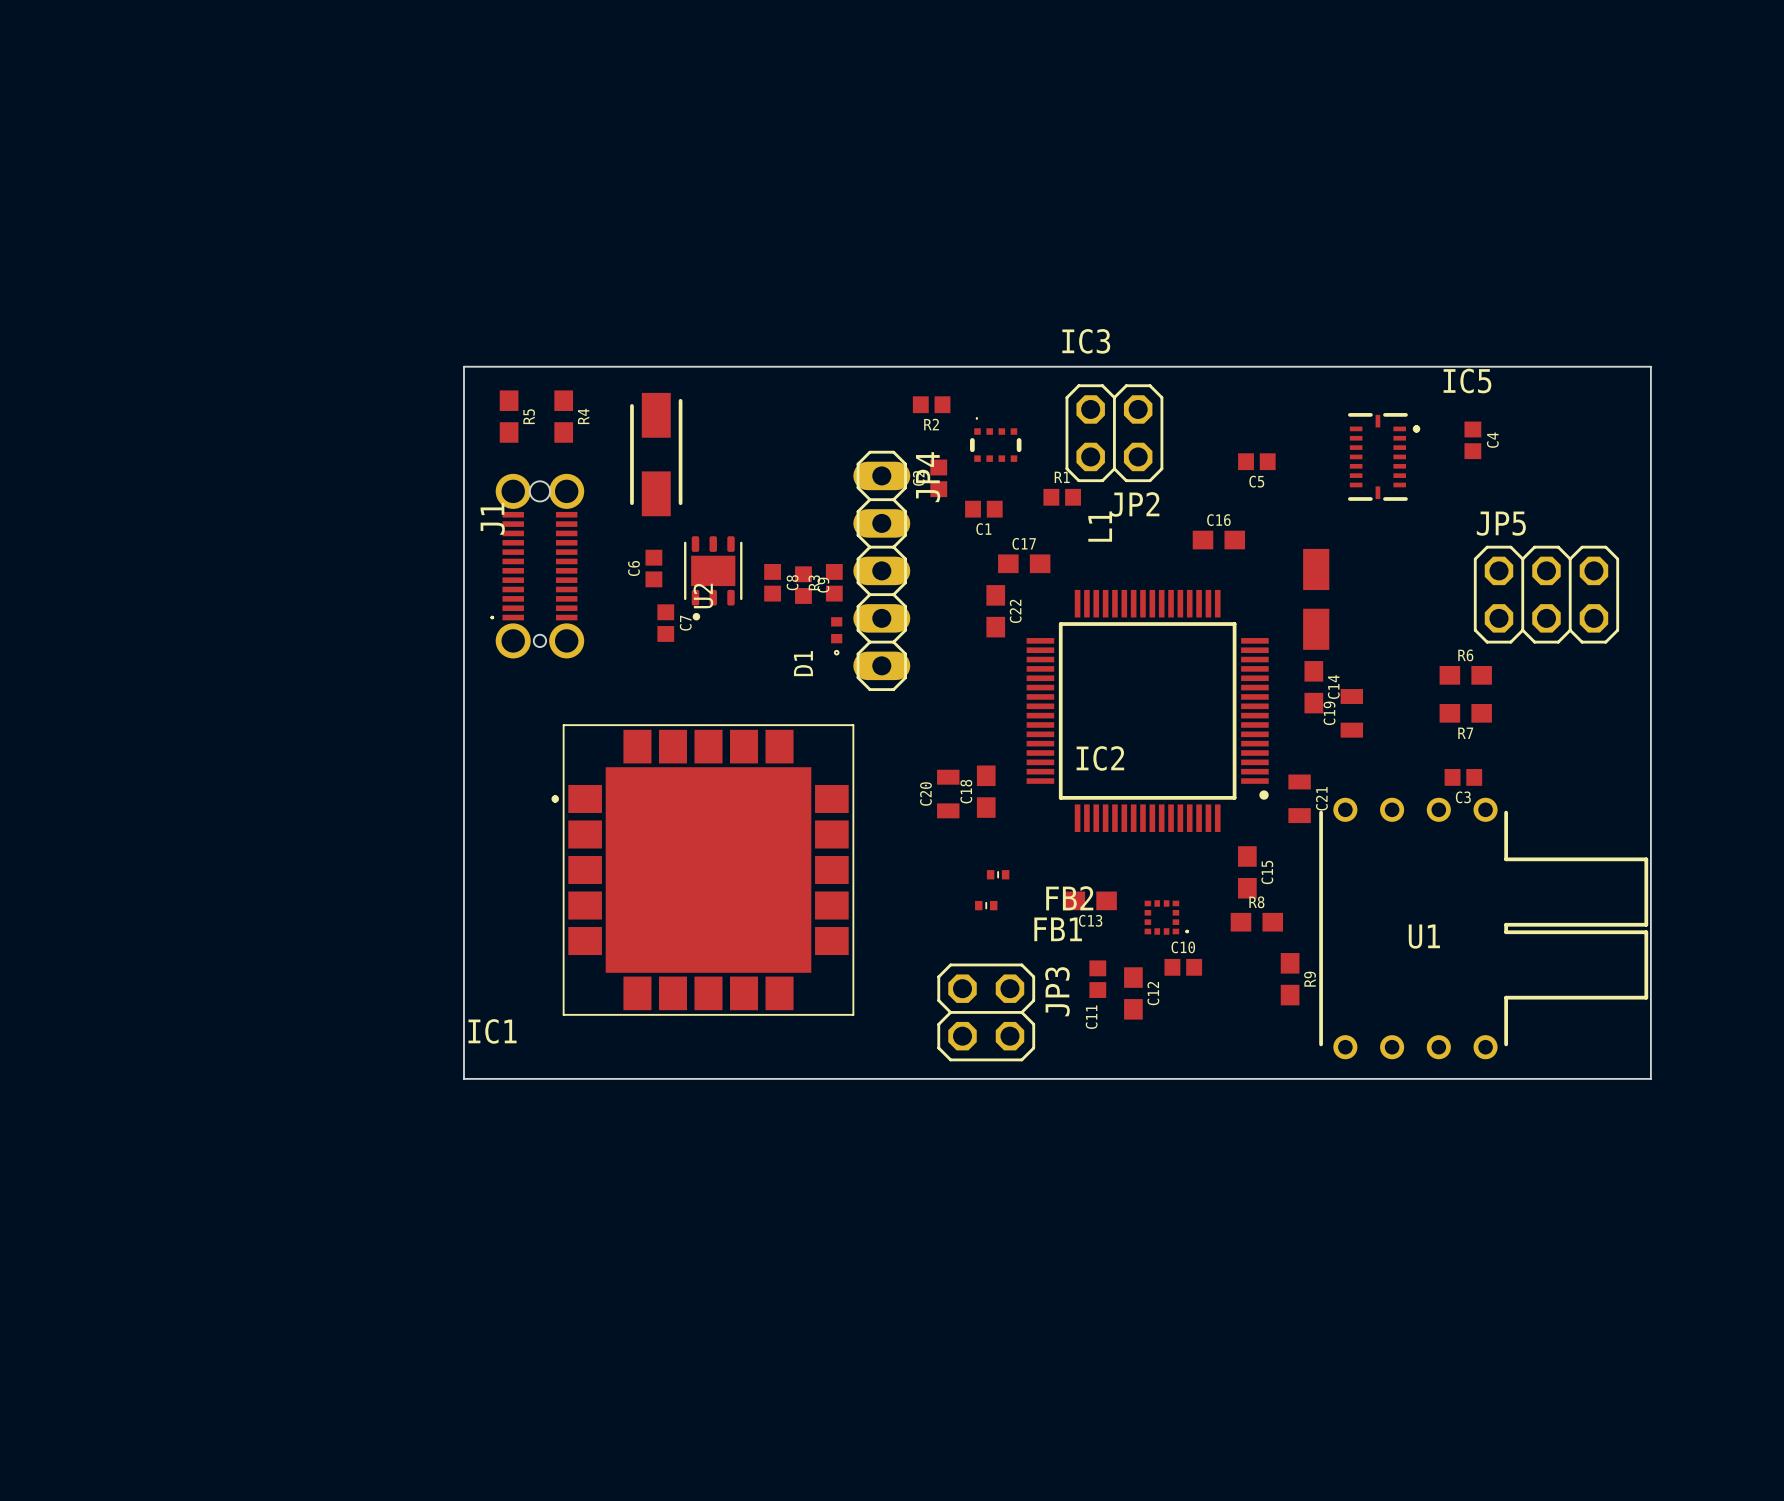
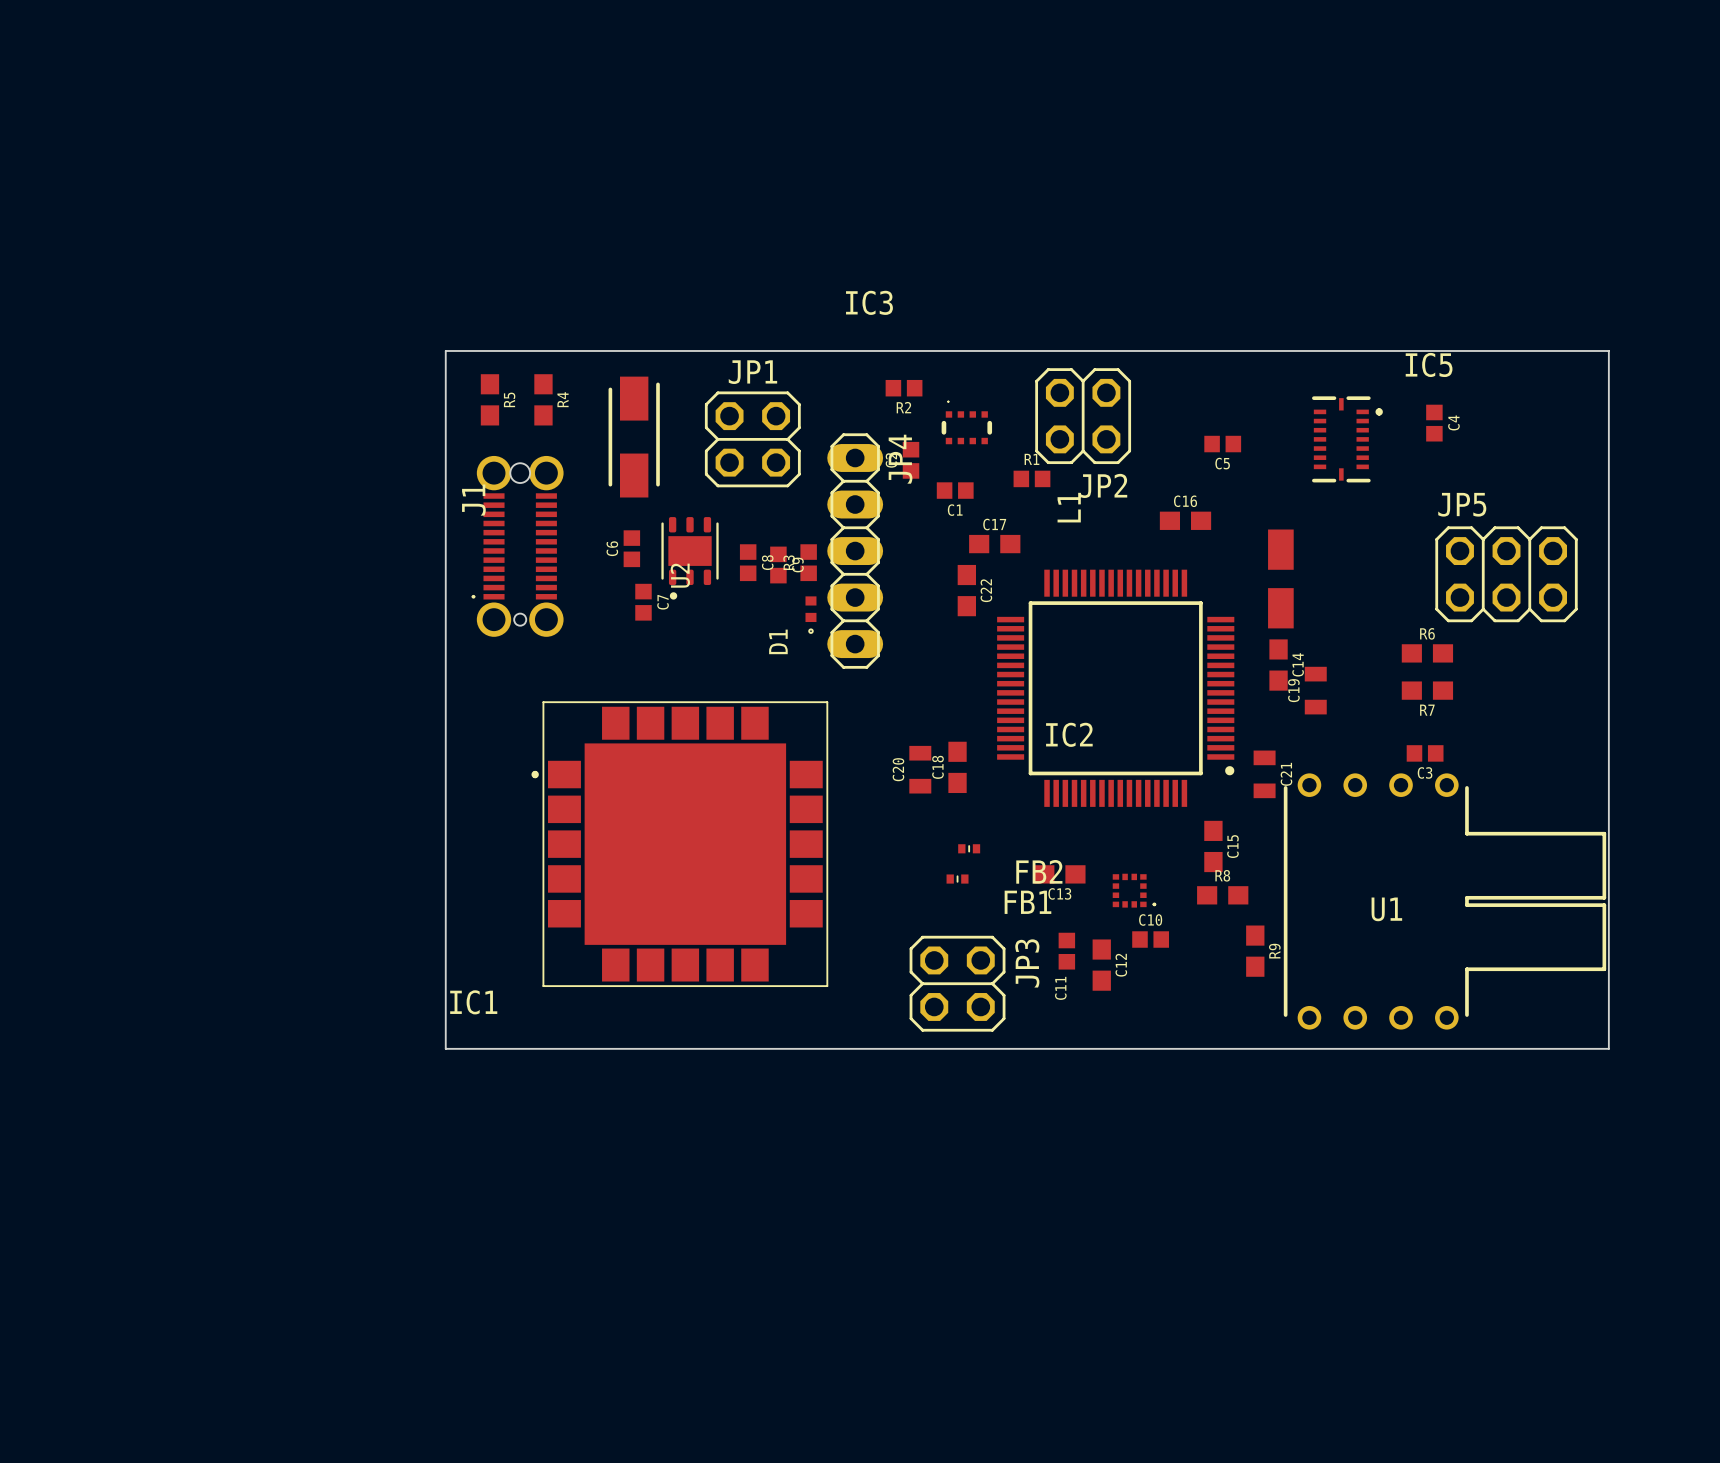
IC3 name position: IC3 (1086, 341) -> IC3 (869, 302)
JP1: none -> (752, 439)

